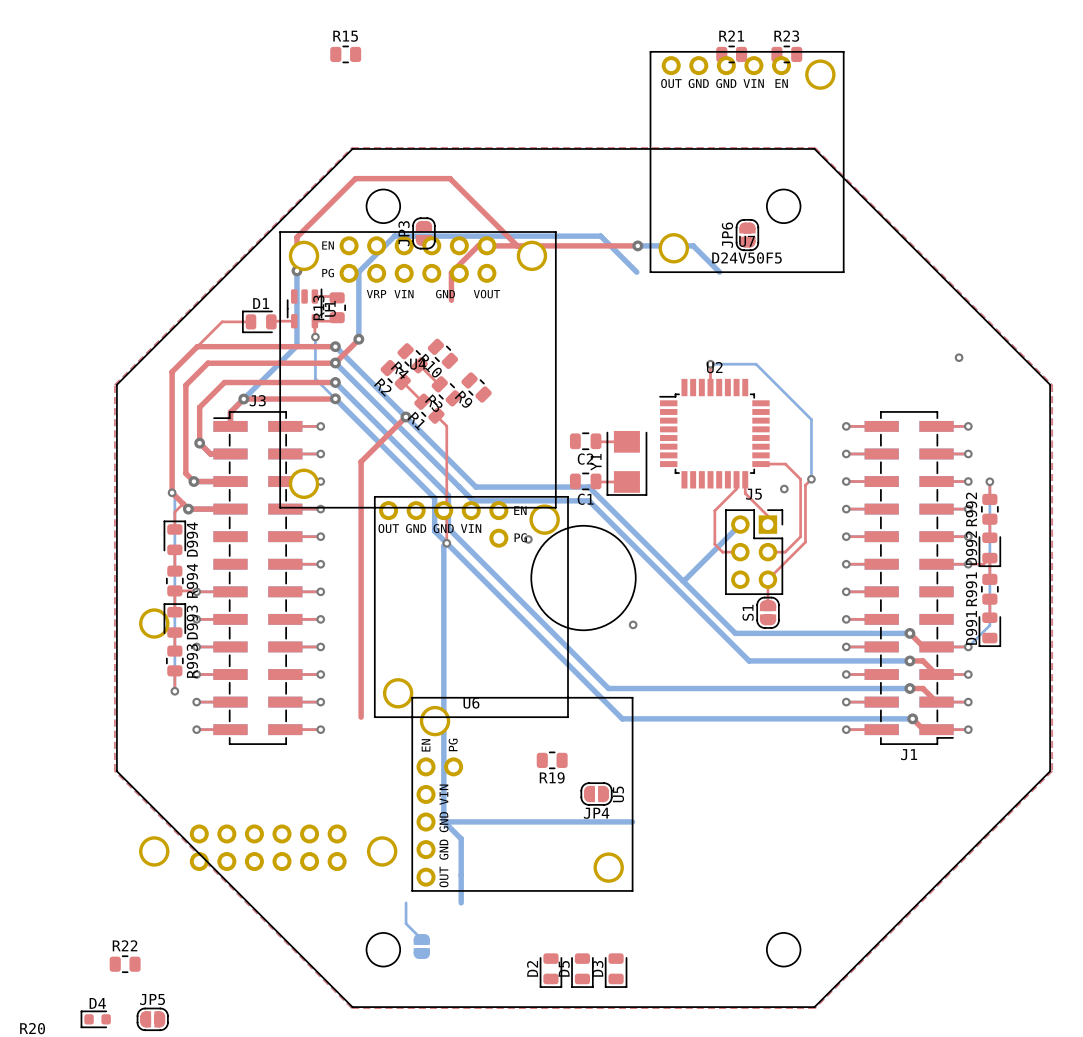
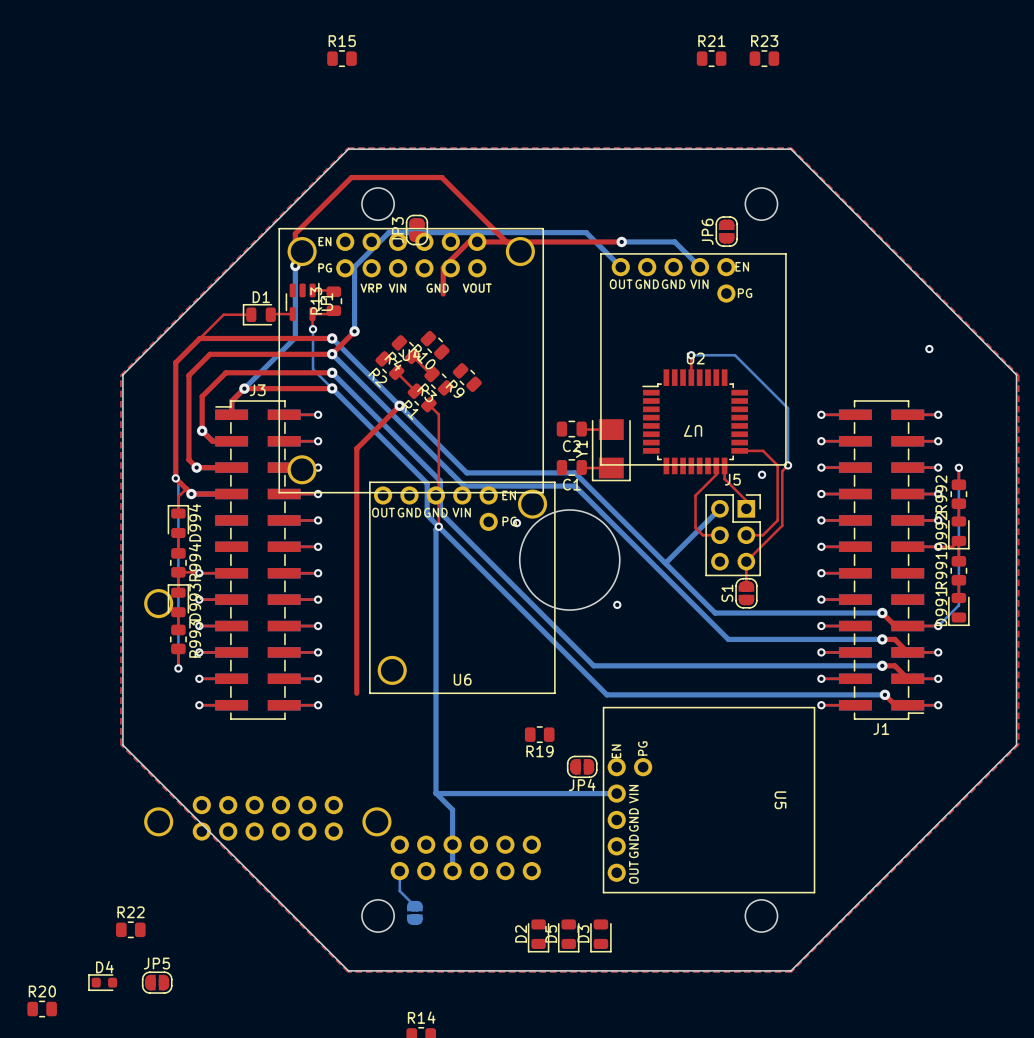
U7 footprint: [649, 51, 845, 273] -> [600, 253, 787, 466]
U7 value: D24V50F5 (746, 257) -> none
U5 footprint: [411, 697, 634, 892] -> [602, 706, 816, 894]
U5 name position: U5 (618, 794) -> U5 (780, 800)
part: none -> (465, 857)

